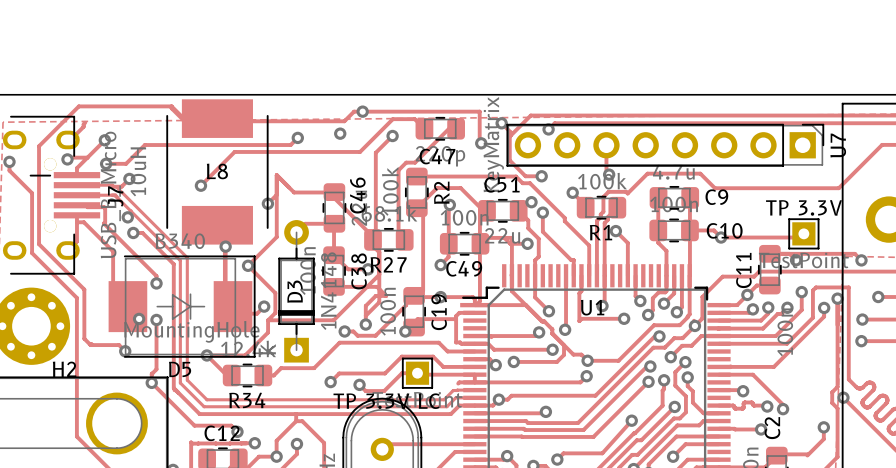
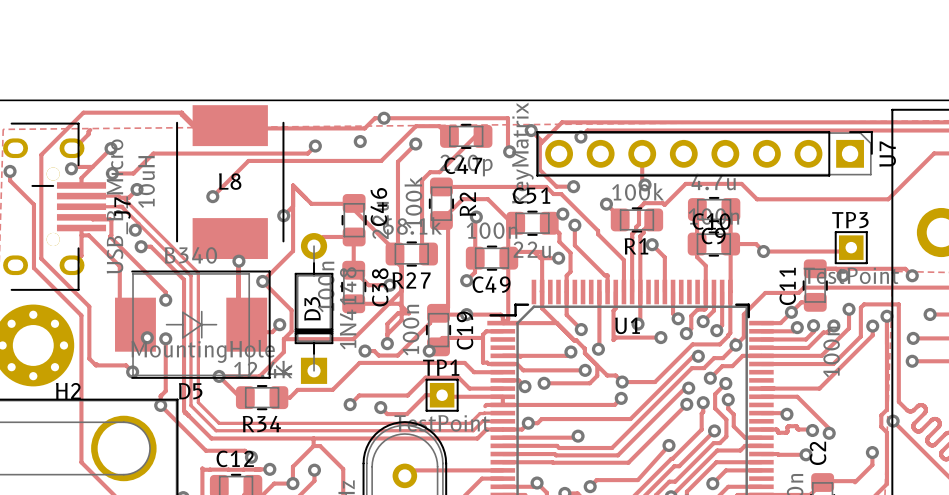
C9 name position: C9 (716, 197) -> C9 (713, 236)
TP 3.3V name: TP 3.3V (803, 207) -> TP3 (850, 220)
C10 name position: C10 (724, 230) -> C10 (711, 221)
TP 3.3V LC name: TP 3.3V LC (386, 401) -> TP1 (441, 367)

